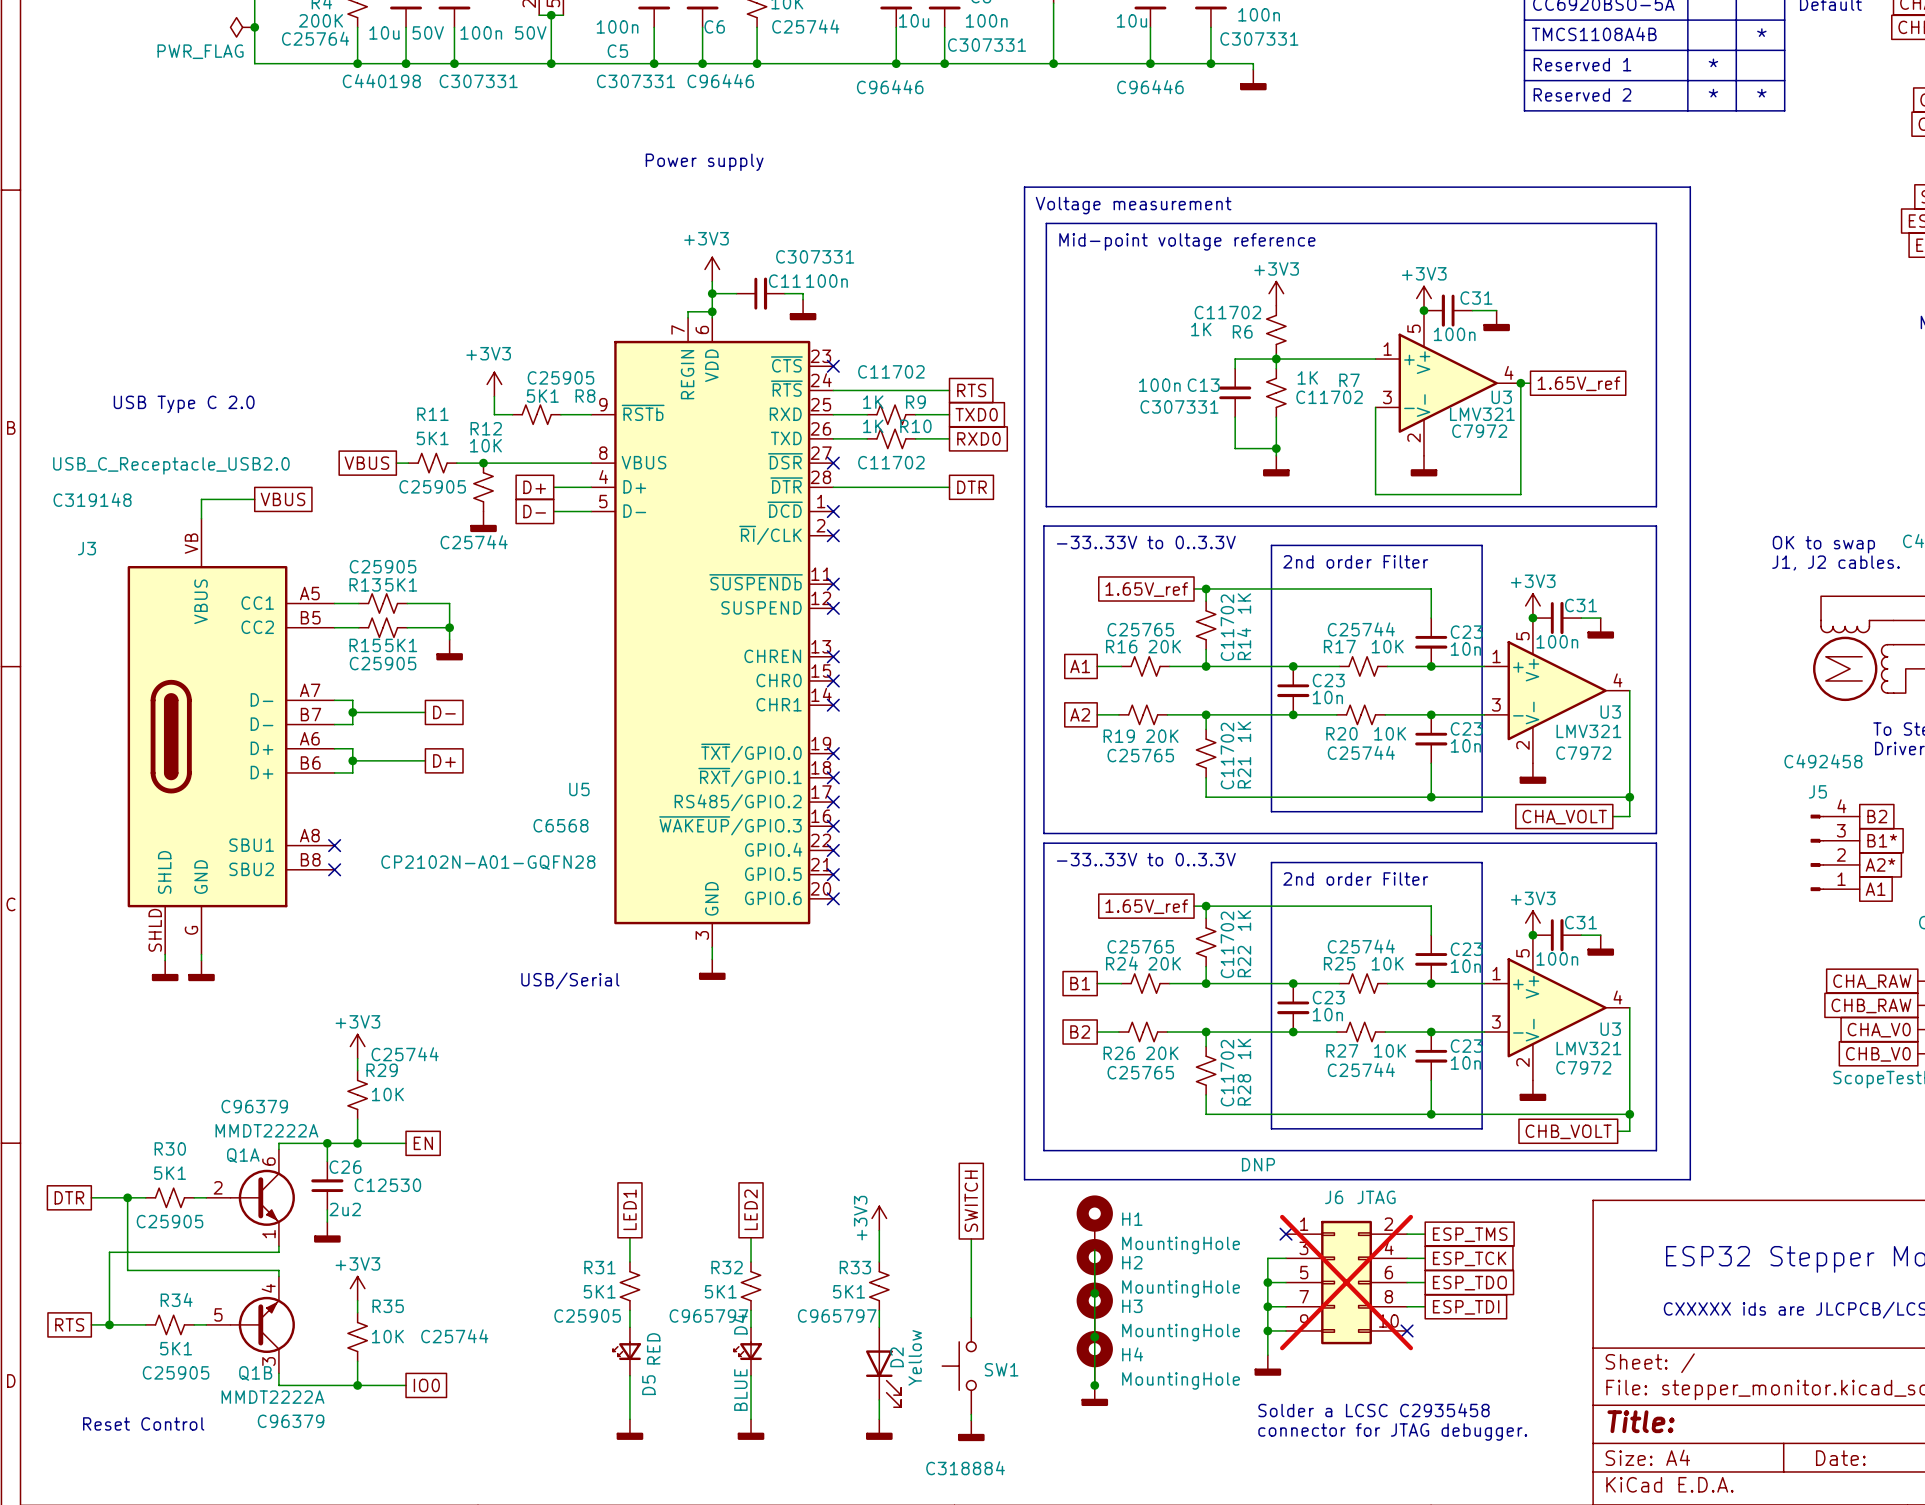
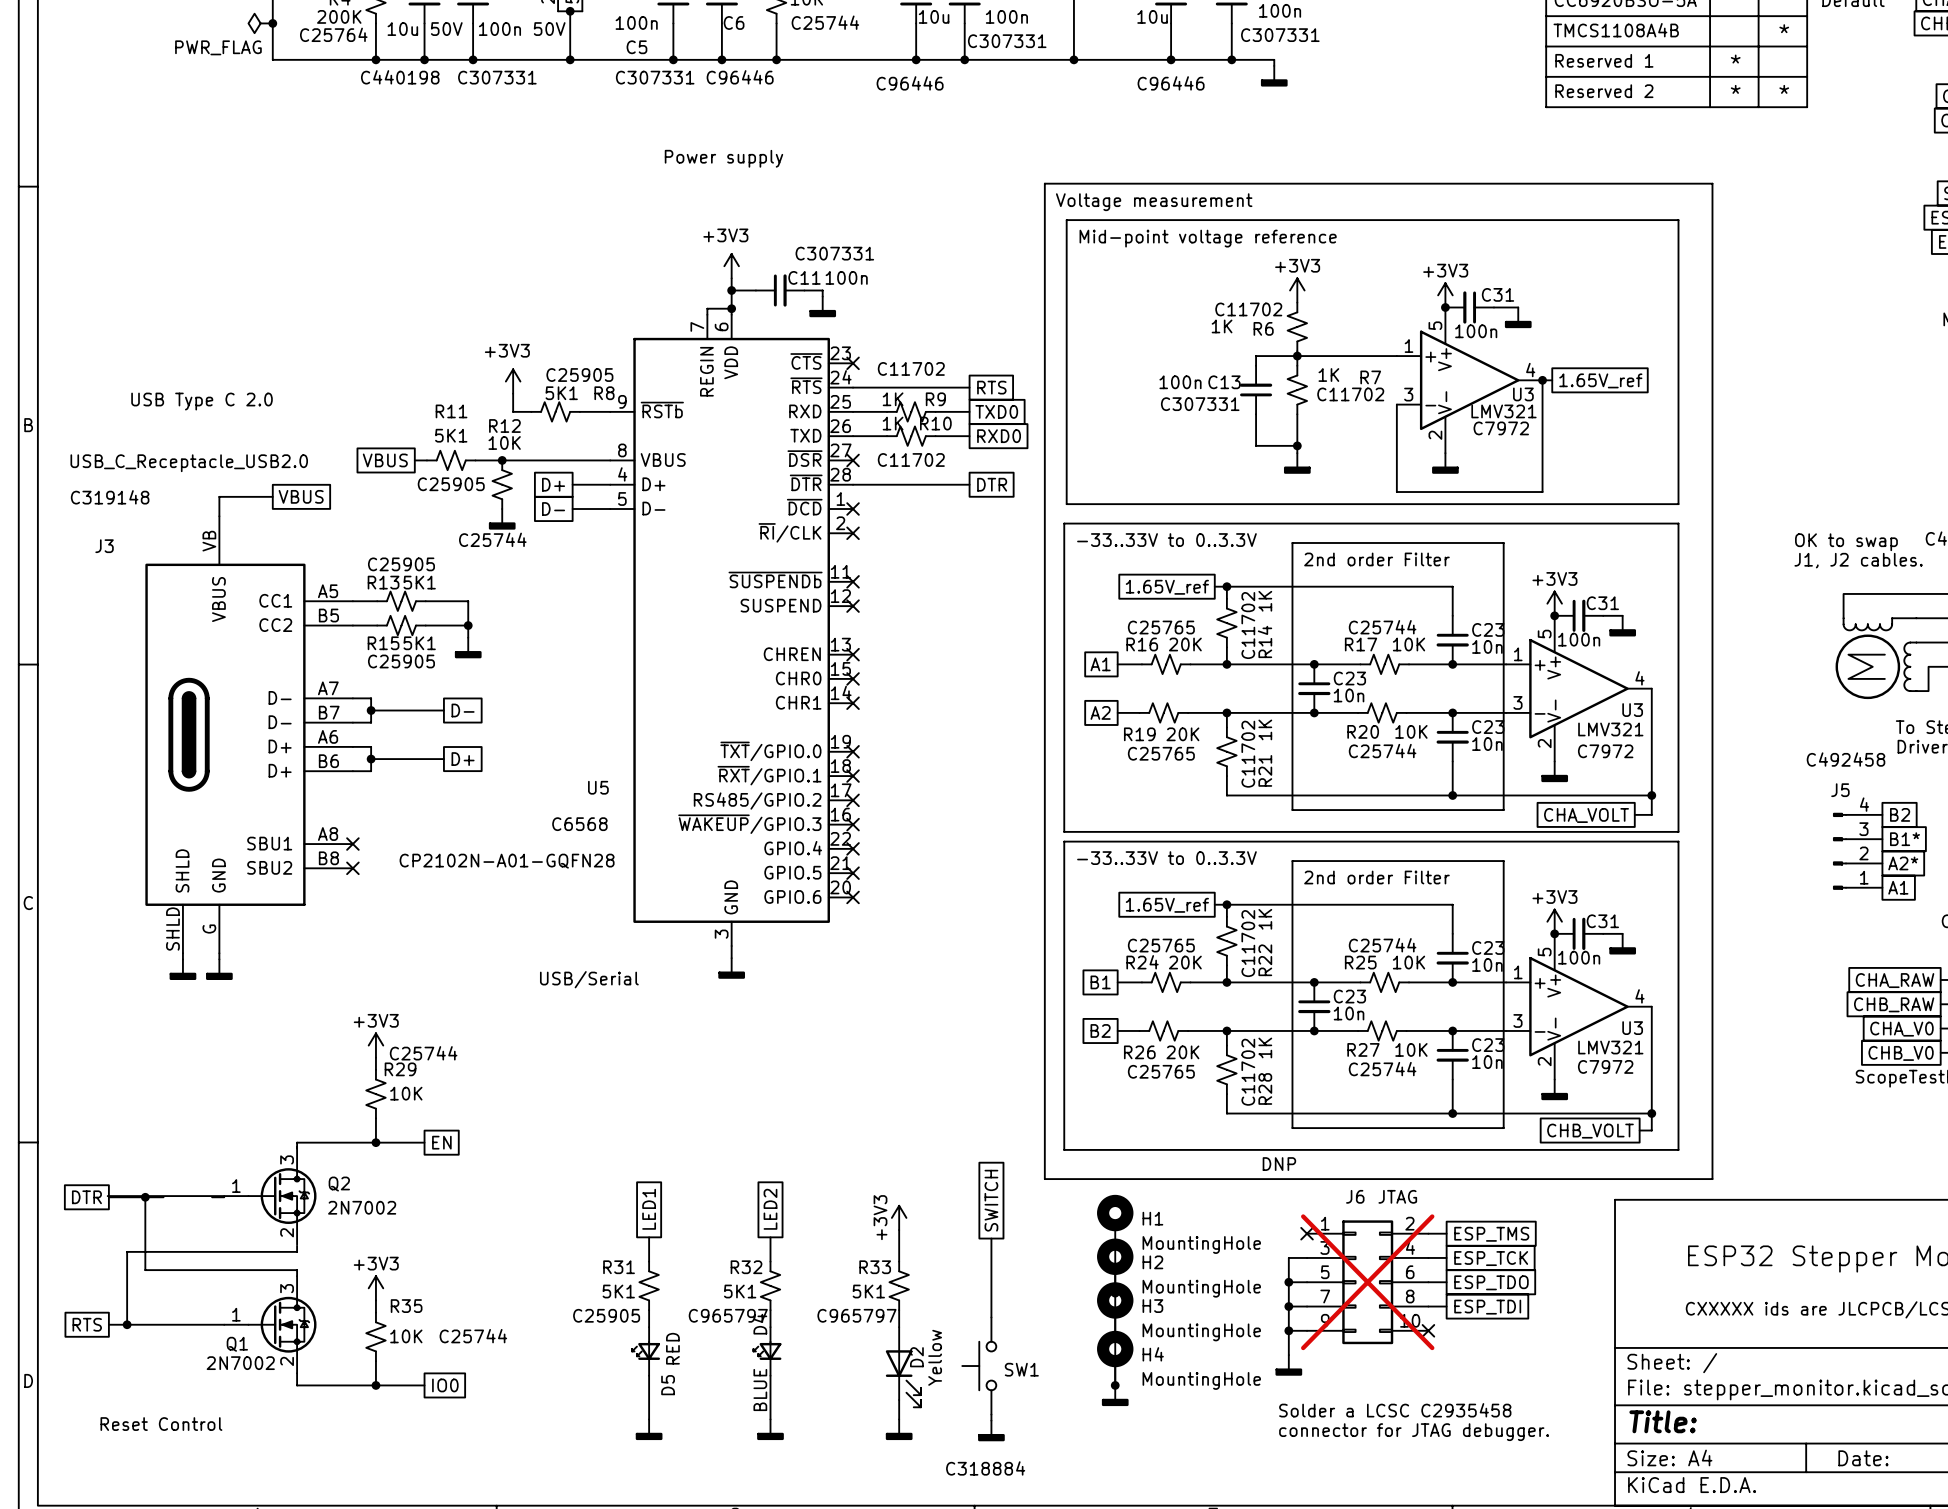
wire: (327, 1143) (327, 1161) -> none
junction: (327, 1143) -> none
C26: 2u2 (327, 1185) -> none
wire: none -> (107, 1196) (224, 1196)
Q2: none -> 2N7002 (270, 1196)
R30: 5K1 (170, 1197) -> none
Q1A: MMDT2222A (250, 1197) -> none
wire: (327, 1209) (327, 1222) -> none
power symbol: (327, 1232) -> none
R34: 5K1 (170, 1324) -> none
Q1B: MMDT2222A (250, 1324) -> none
Q1: none -> 2N7002 (270, 1324)

